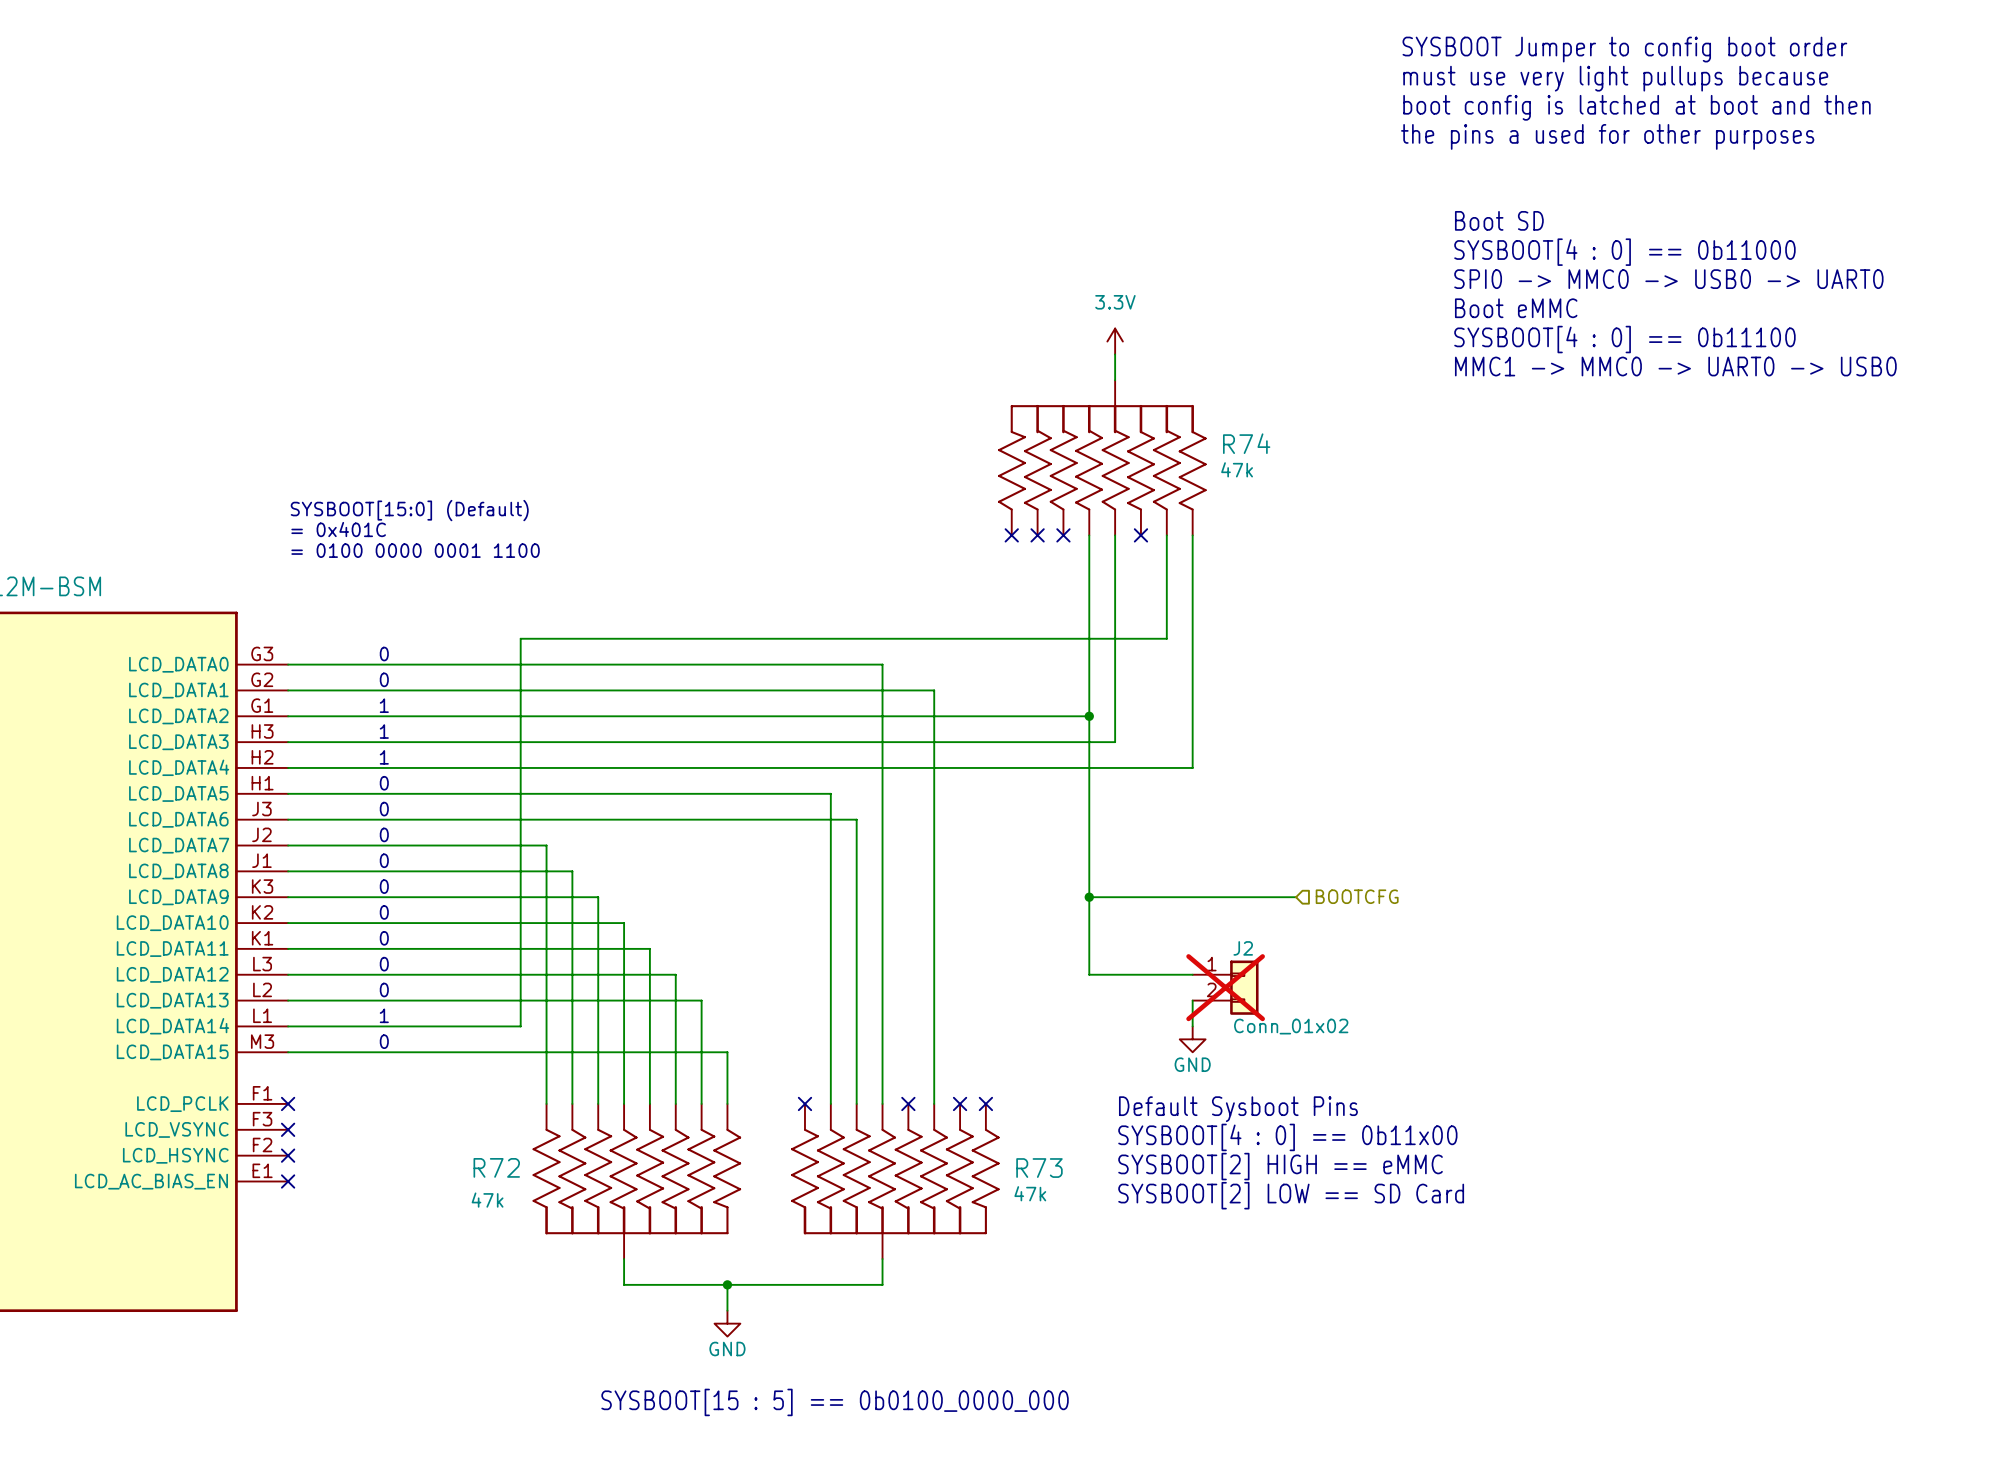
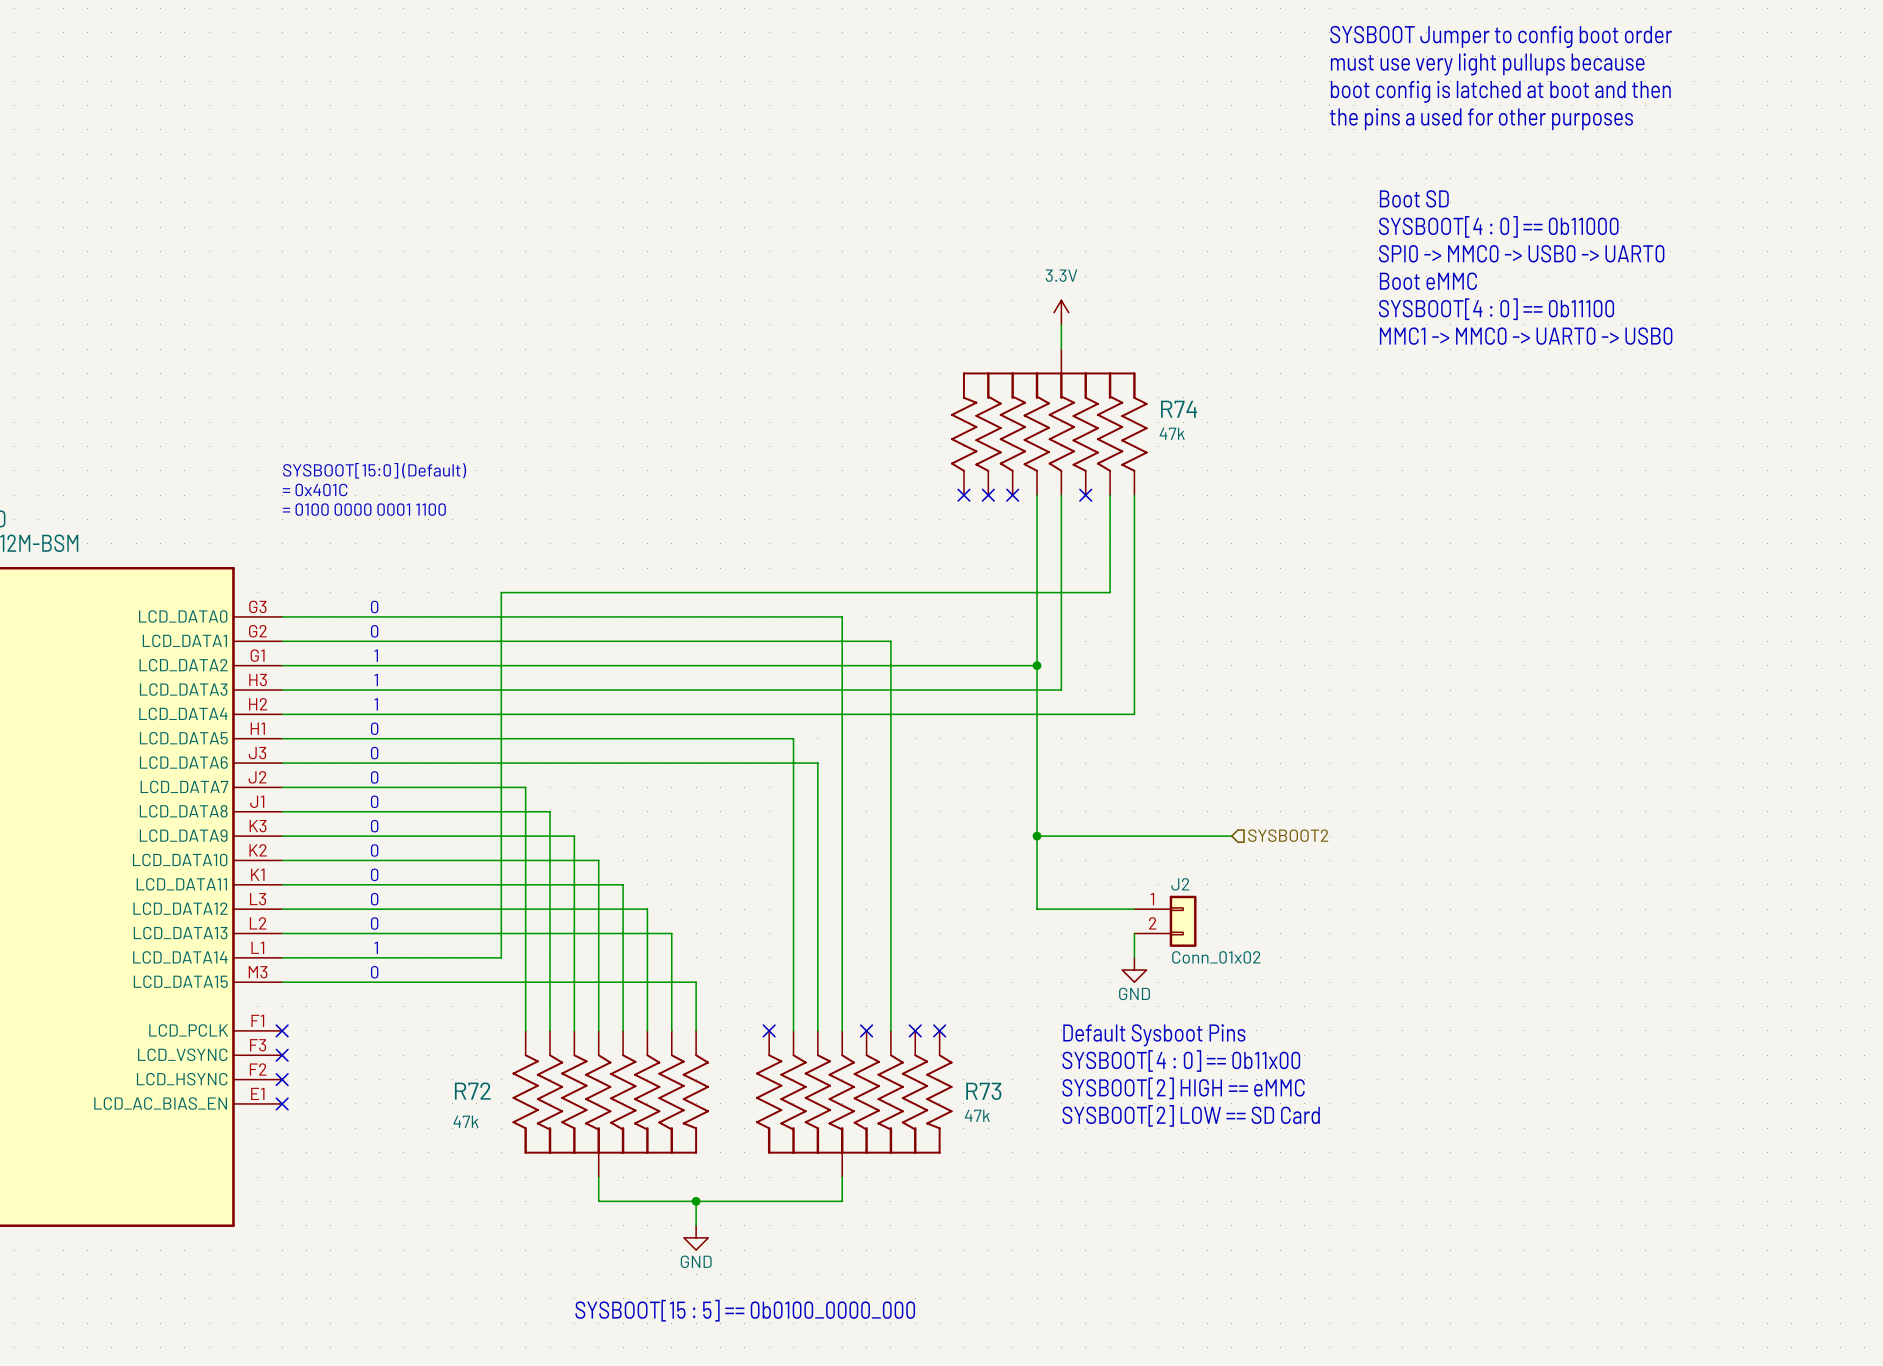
hierarchical label: BOOTCFG (1357, 896) -> SYSBOOT2 (1288, 835)
J2 do-not-place cross: (1225, 987) -> none

